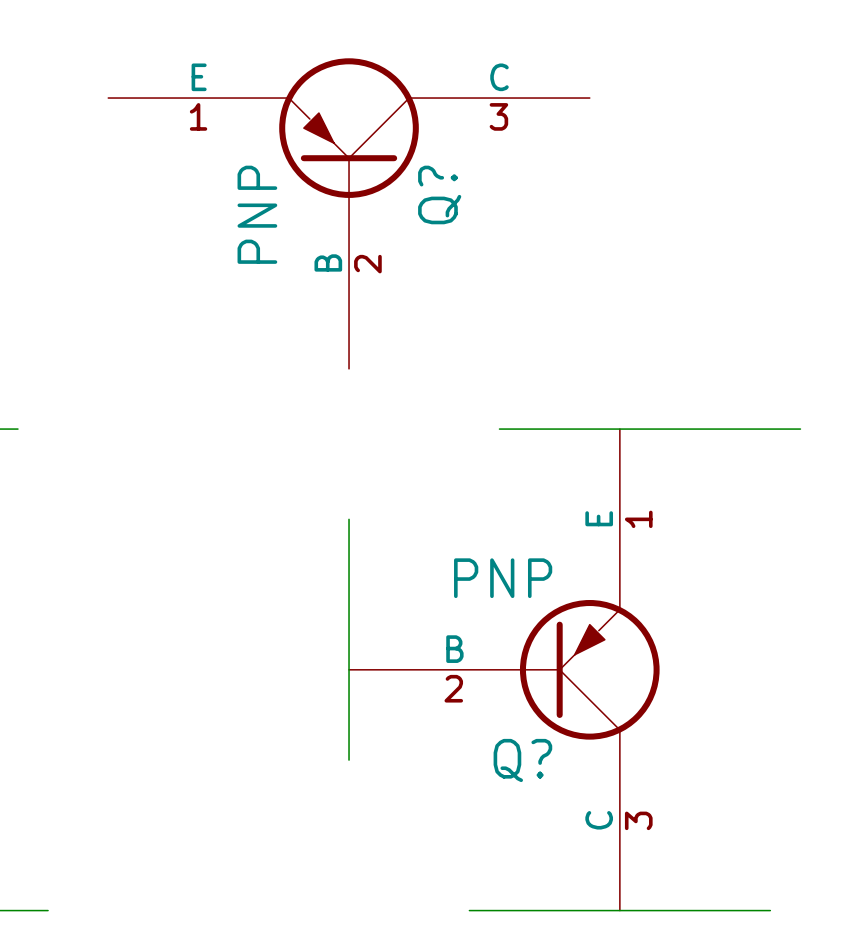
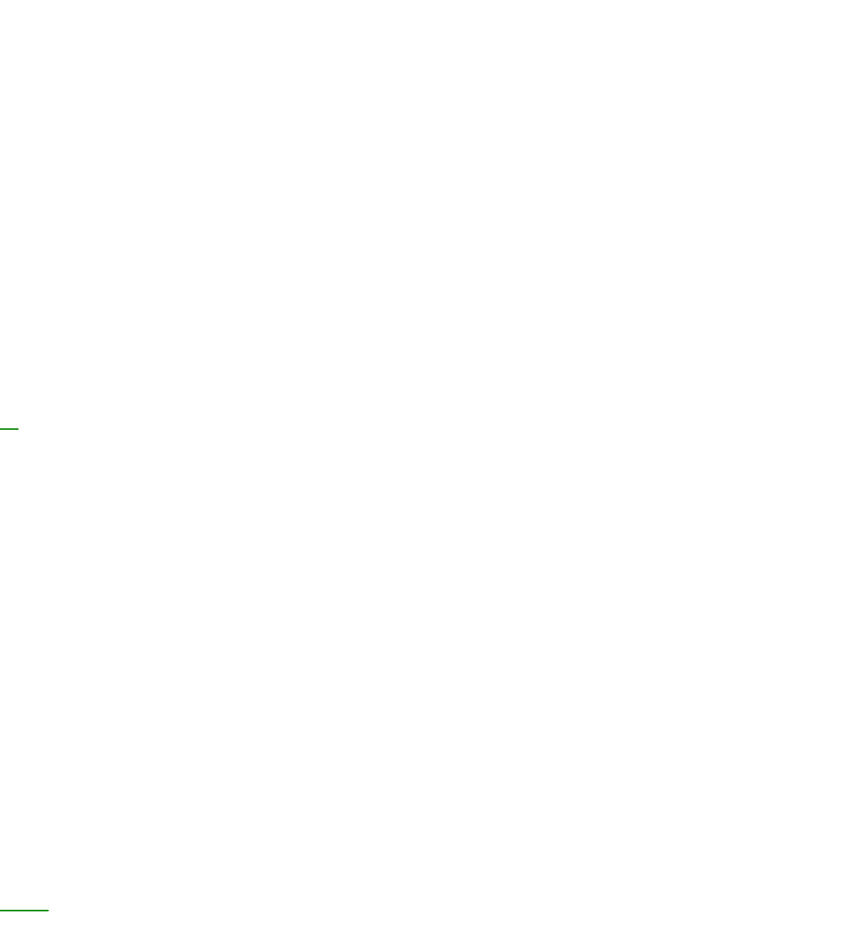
Q?: PNP (349, 213) -> none
wire: (499, 429) (800, 429) -> none
wire: (349, 519) (349, 760) -> none
Q?: PNP (504, 669) -> none
wire: (469, 910) (770, 910) -> none

